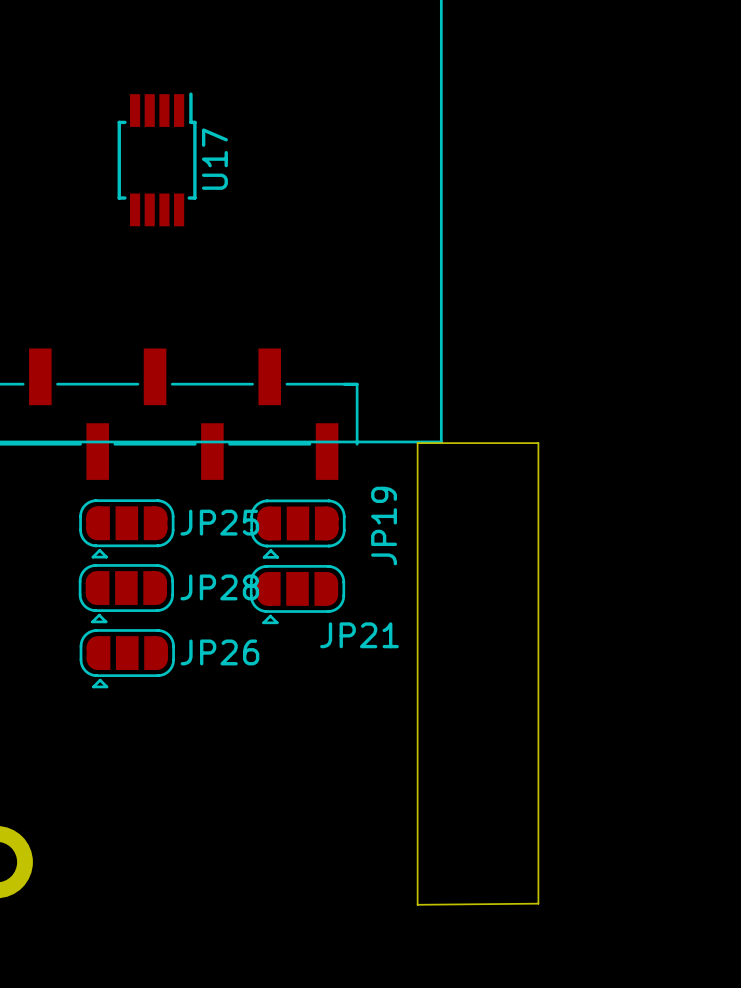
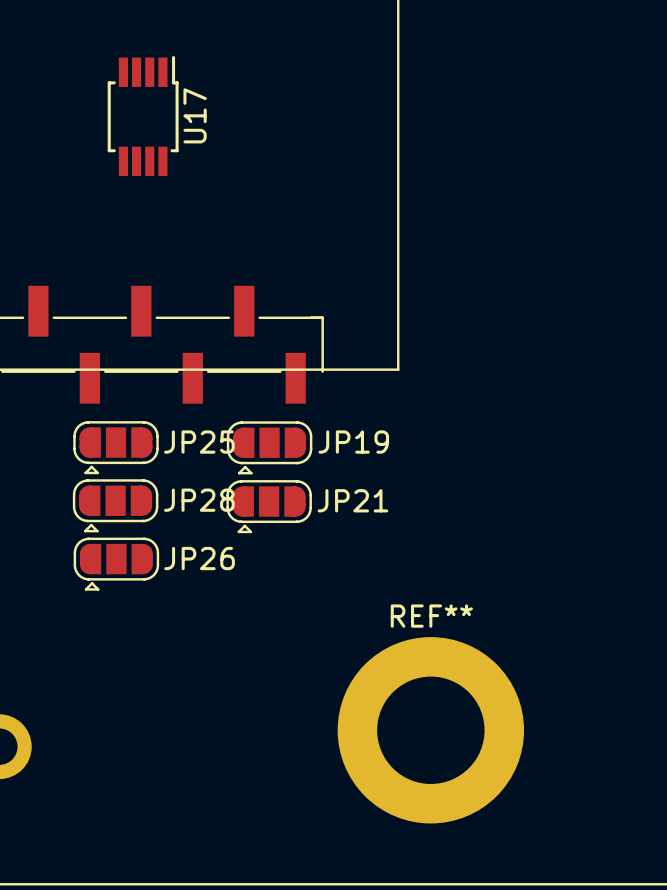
board edge: (417, 443) (417, 904) (538, 903) (538, 443) (417, 443) -> none
JP19 name rotation: 0° (384, 526) -> 90° clockwise (353, 442)
JP21 name position: JP21 (359, 635) -> JP21 (352, 500)
REF**: none -> (430, 730)

